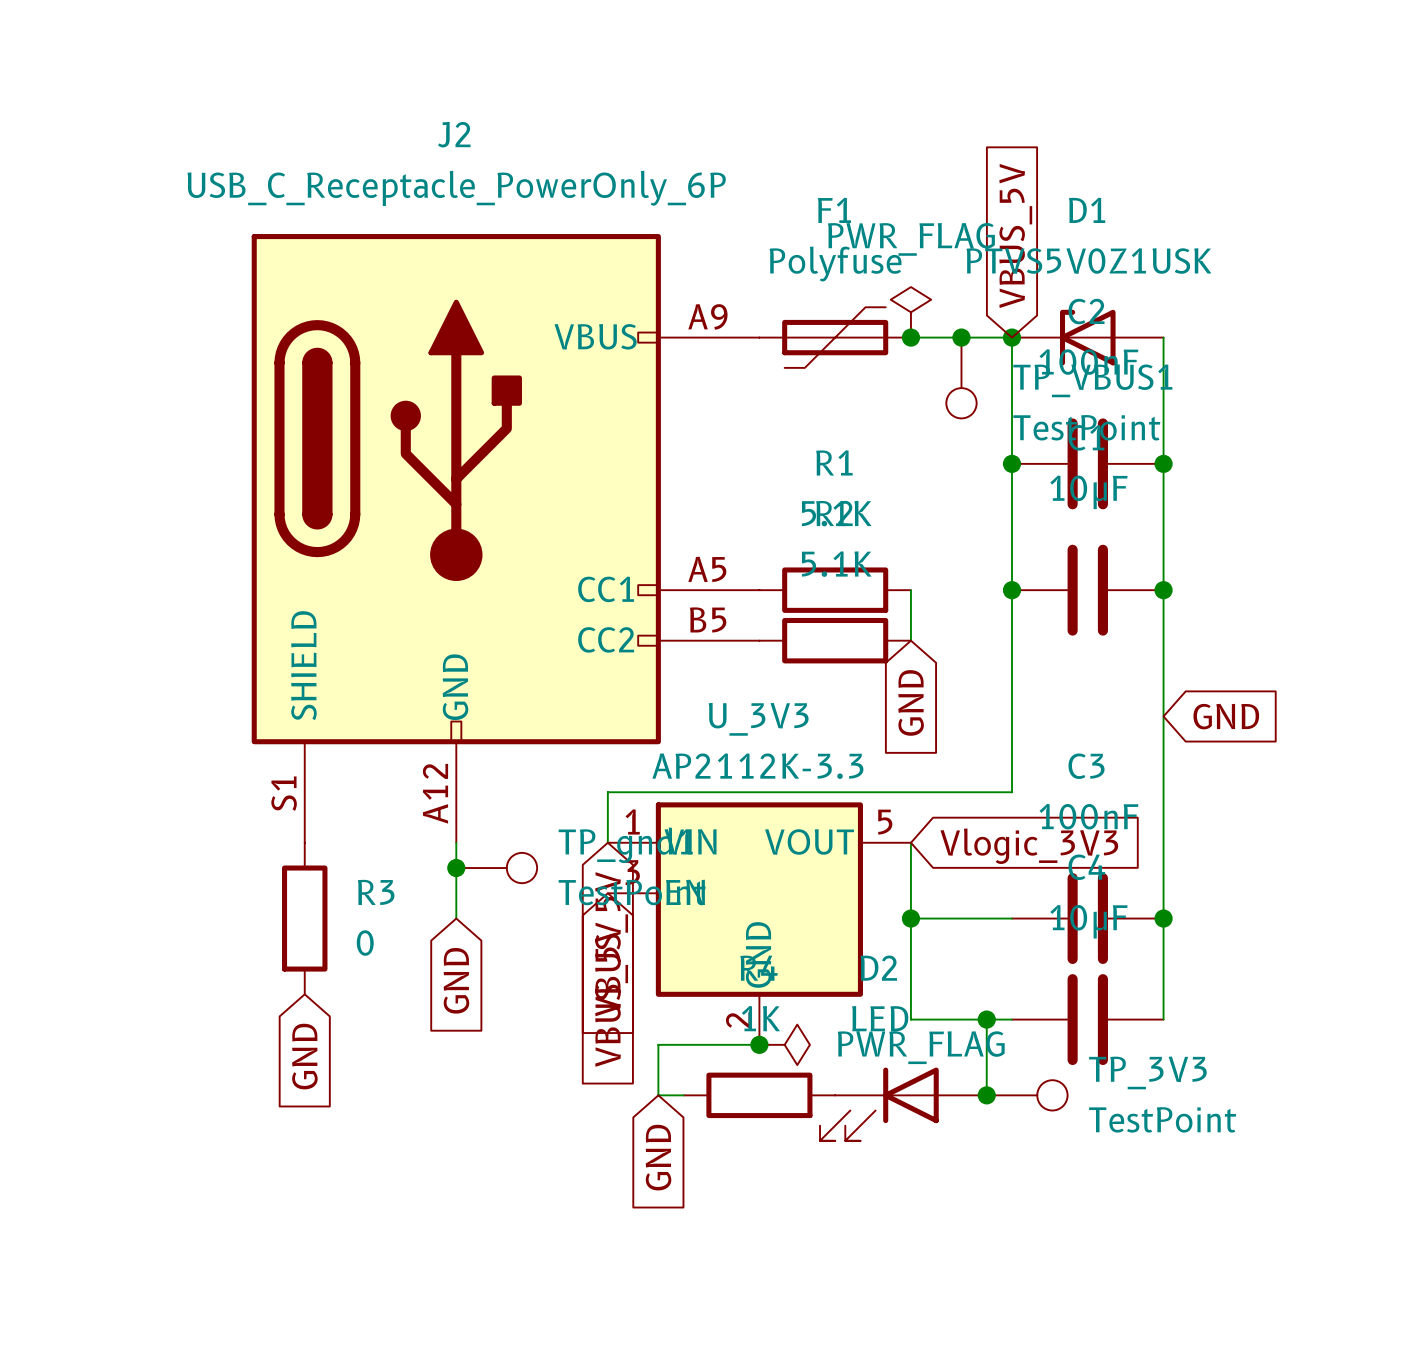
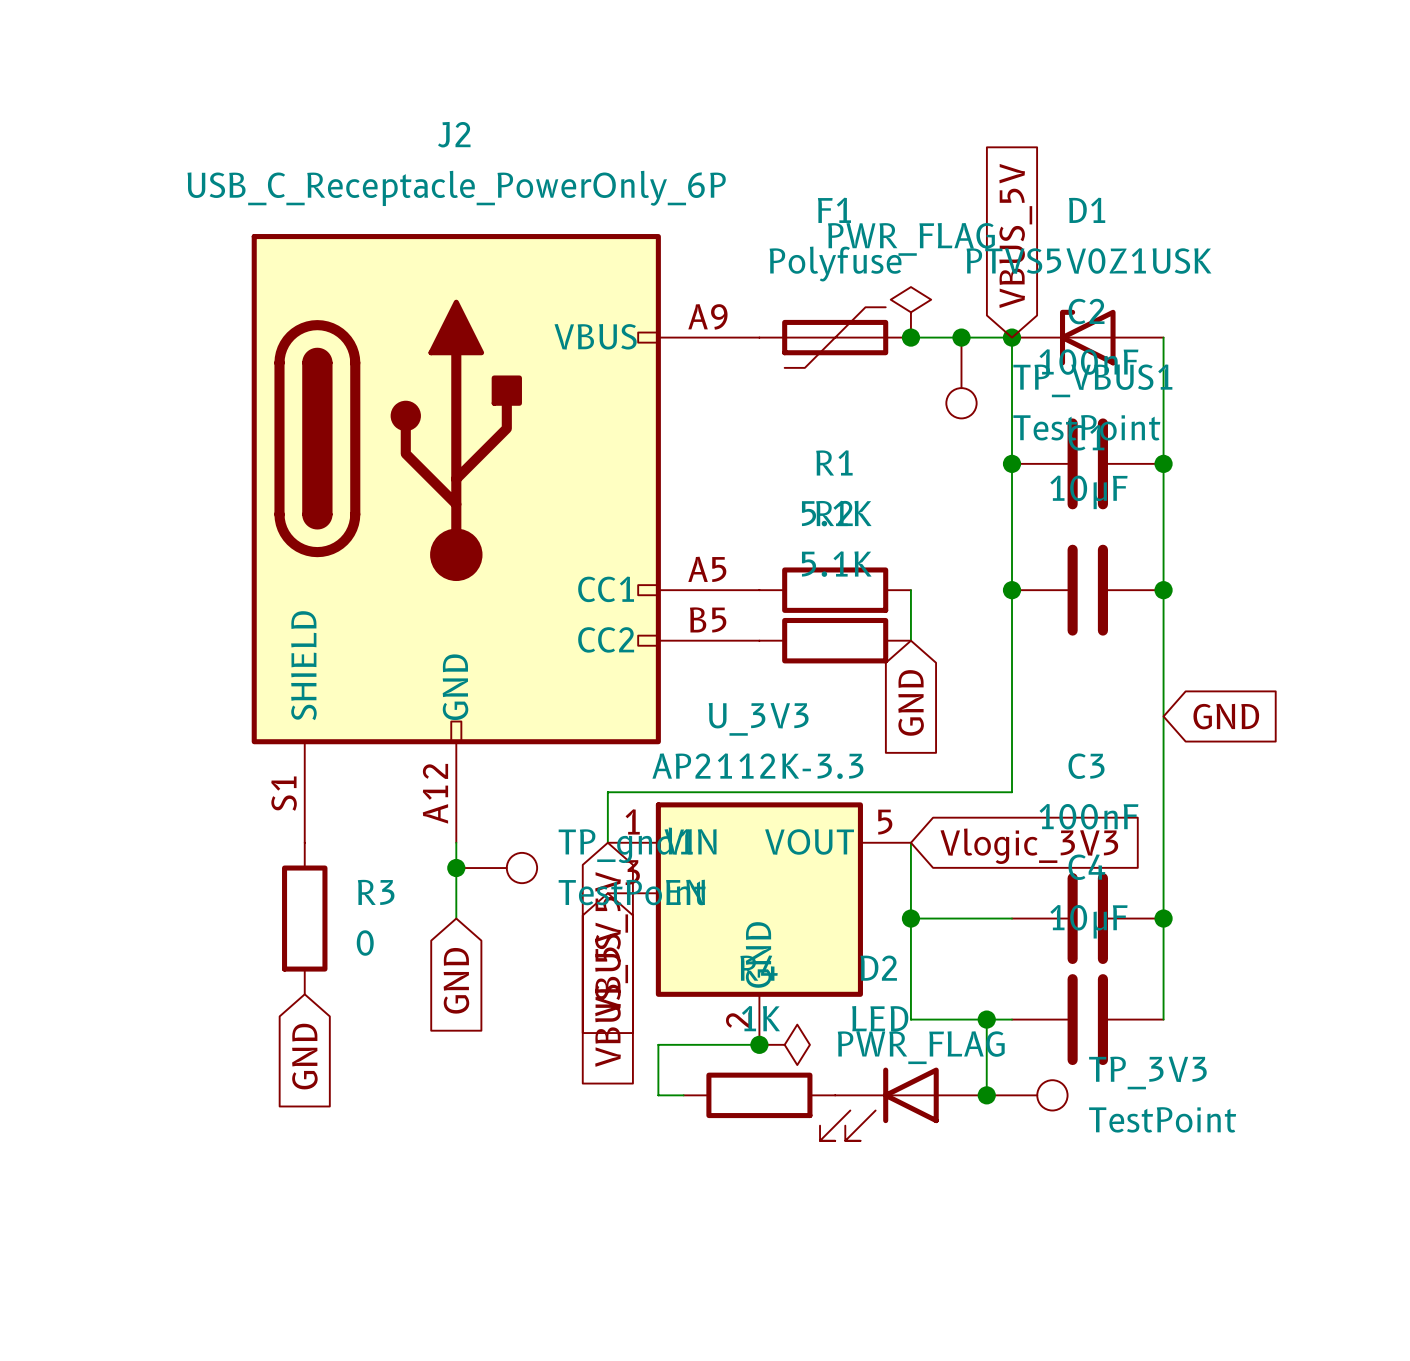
global label: GND (658, 1157) -> none

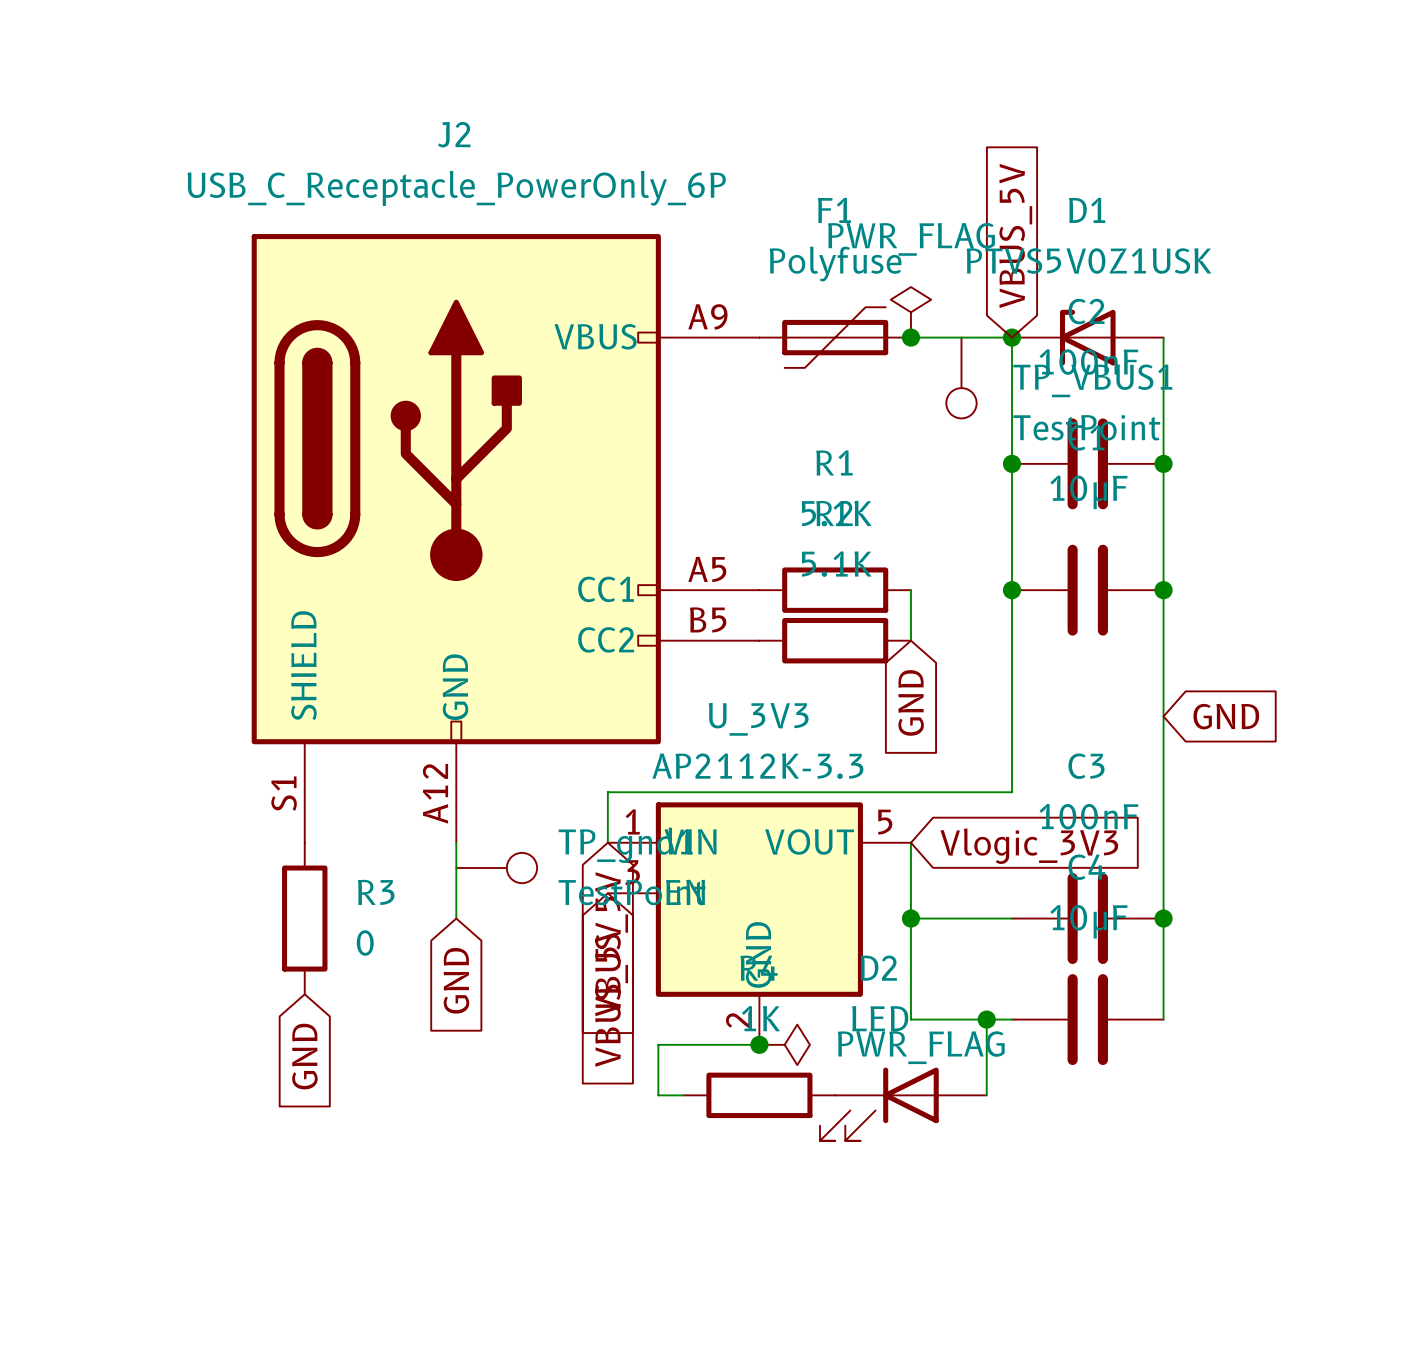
junction: (961, 337) -> none
junction: (456, 868) -> none
junction: (986, 1095) -> none
TP_3V3: TestPoint (1027, 1095) -> none

